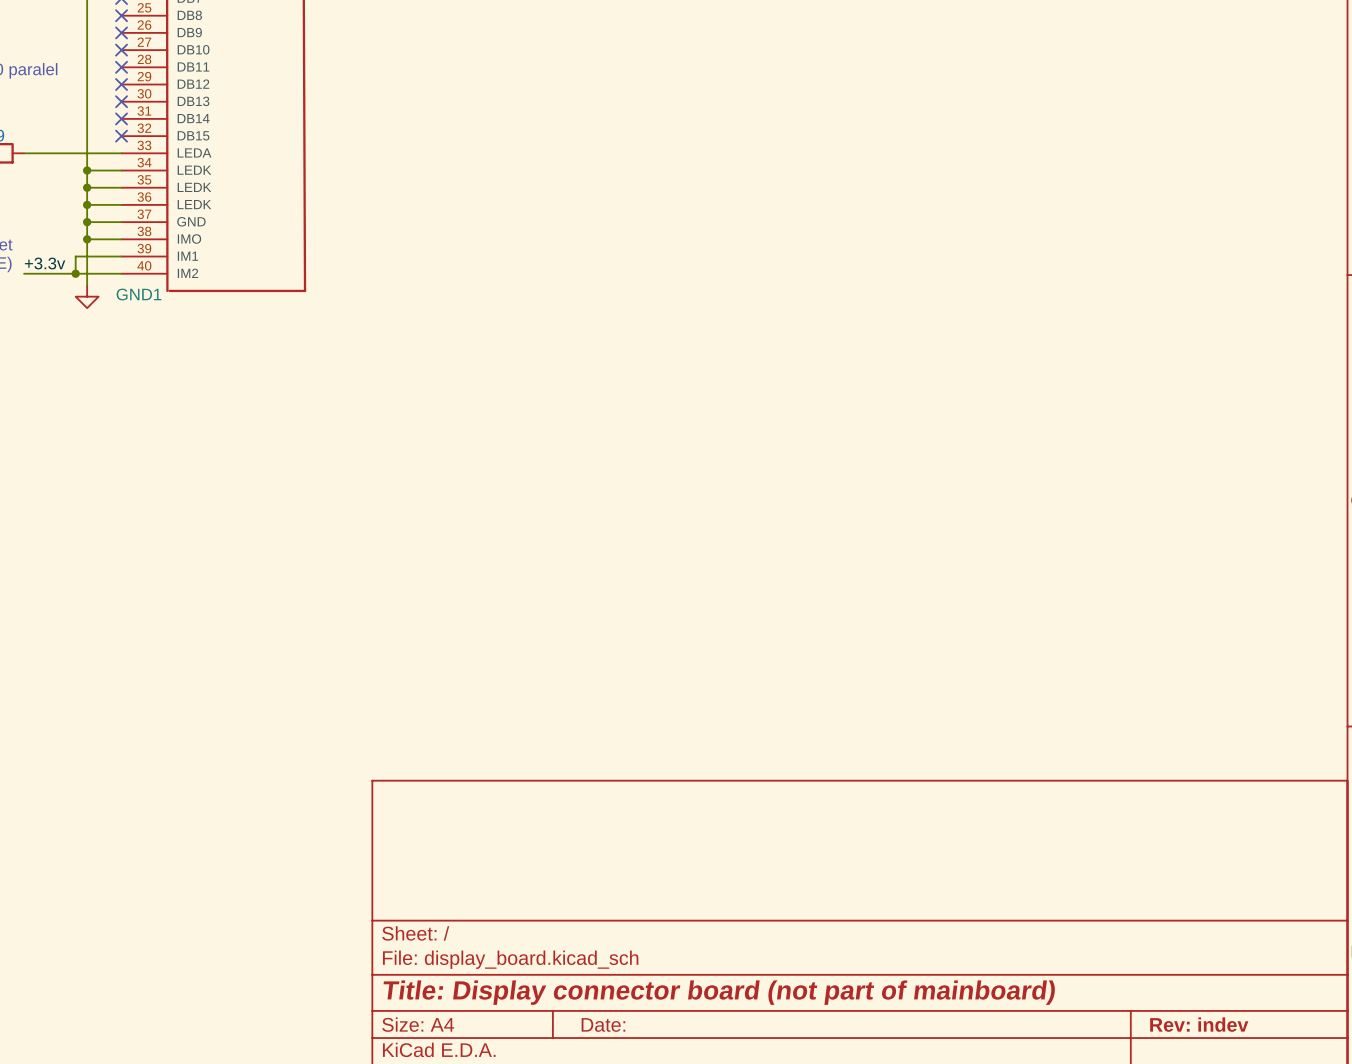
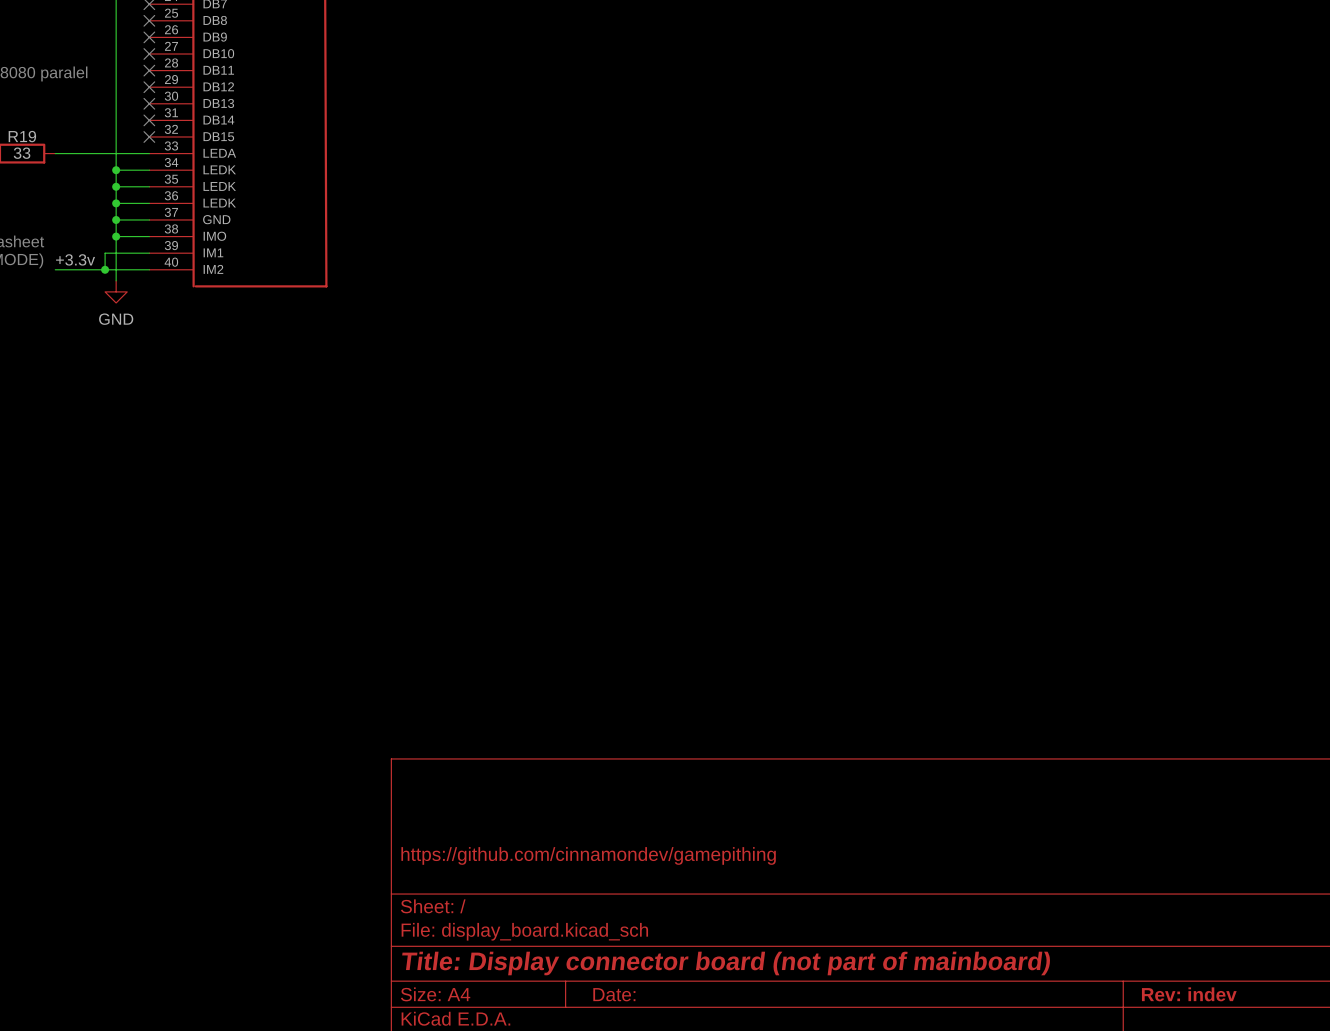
power symbol: GND1 (87, 296) -> GND (116, 291)
title block: none -> https://github.com/cinnamondev/gamepithing (588, 855)

